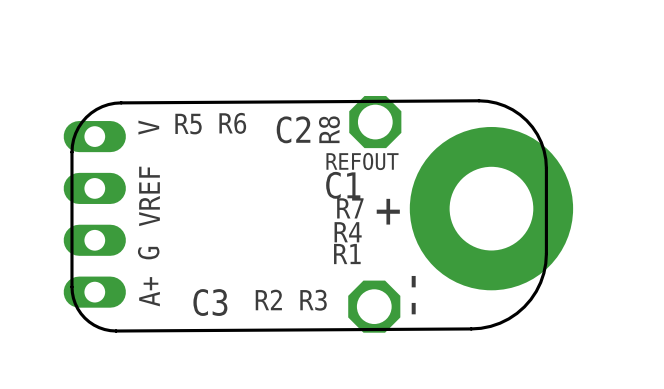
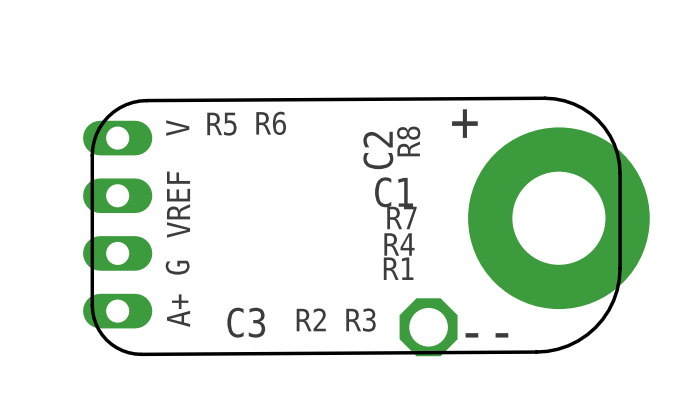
REFOUT: (375, 122) -> none
C2: (293, 129) -> none
R8 name: R8 (329, 129) -> C2 (378, 150)
R8: none -> (408, 141)
text position: + (388, 211) -> + (464, 123)
text rotation: 0° (413, 295) -> 90° clockwise (486, 335)

